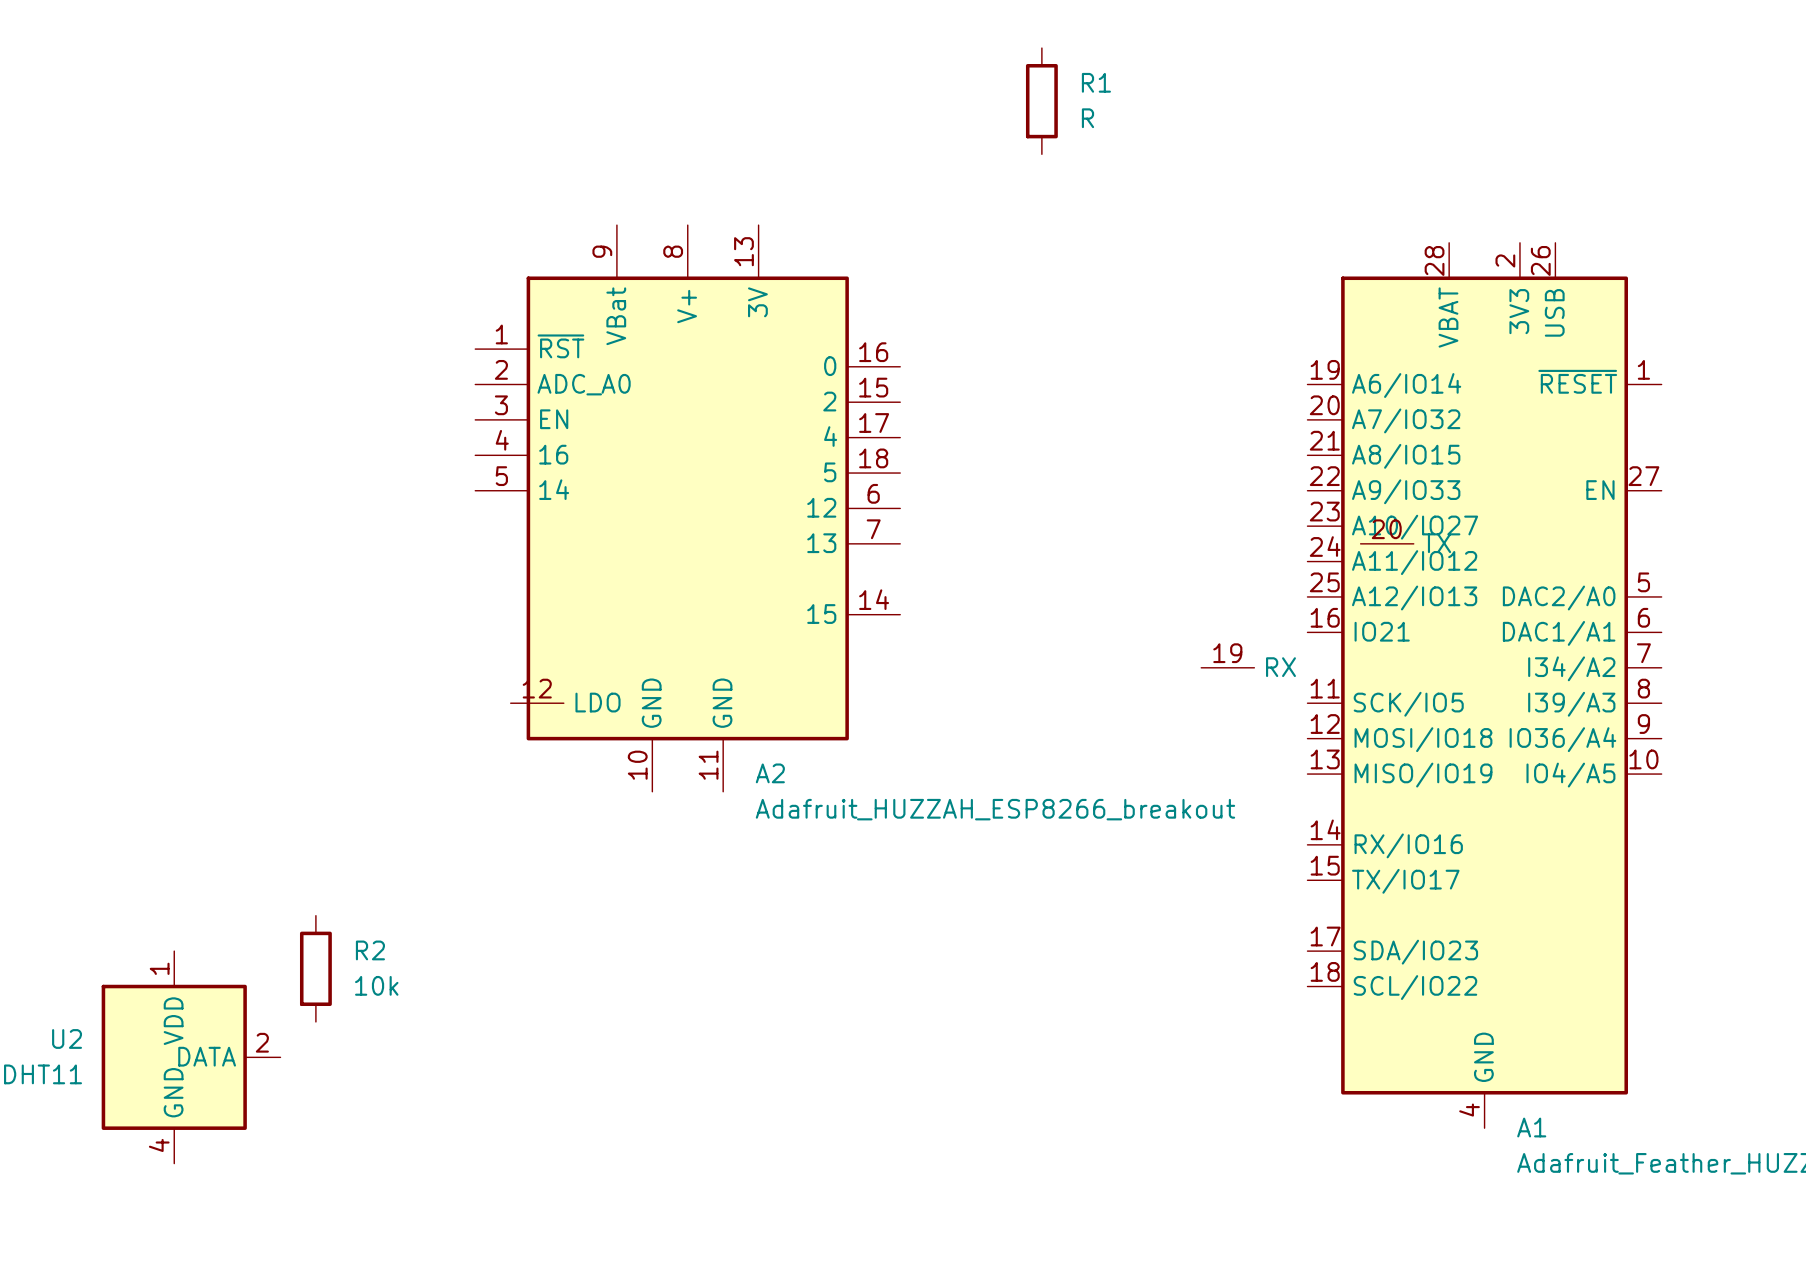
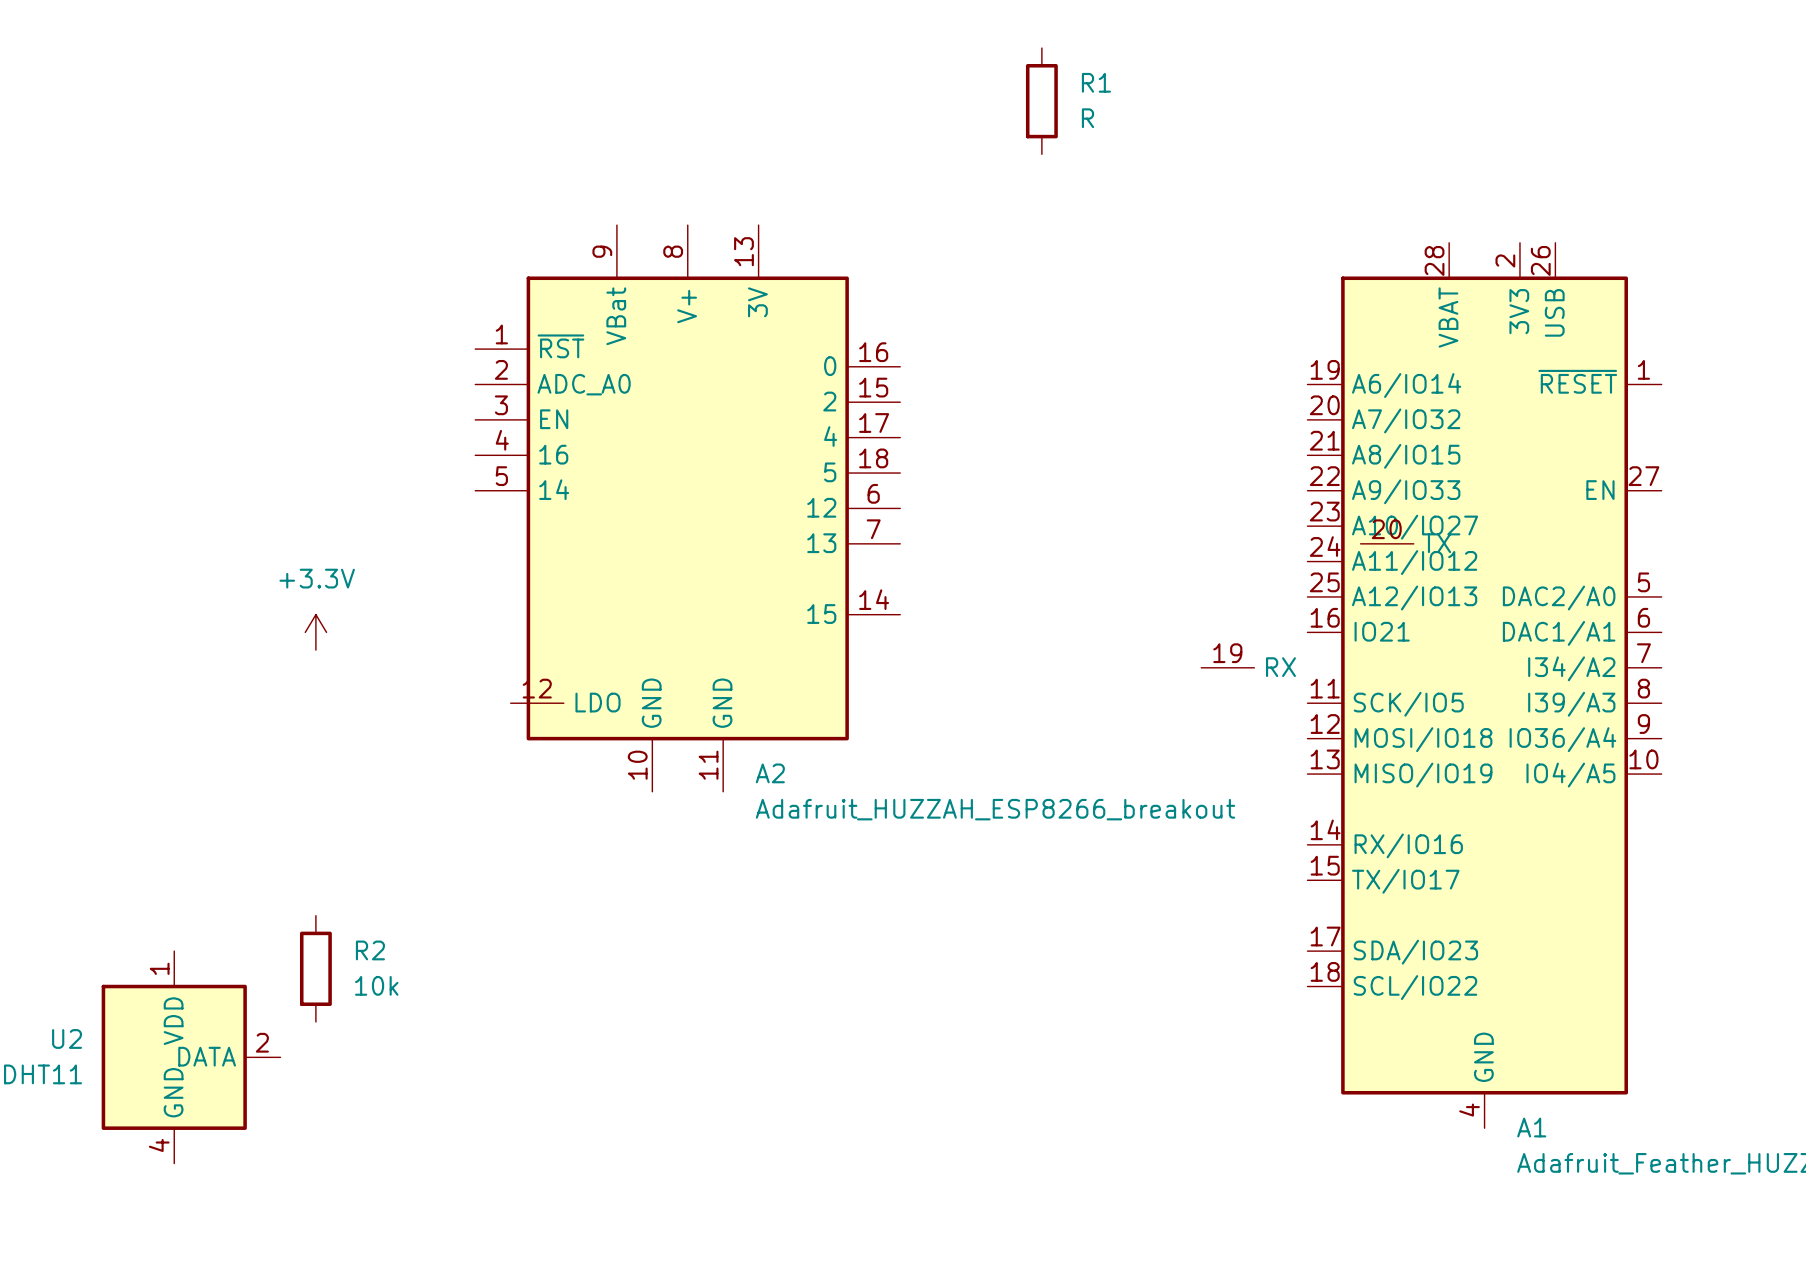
power symbol: none -> +3.3V (315, 632)

